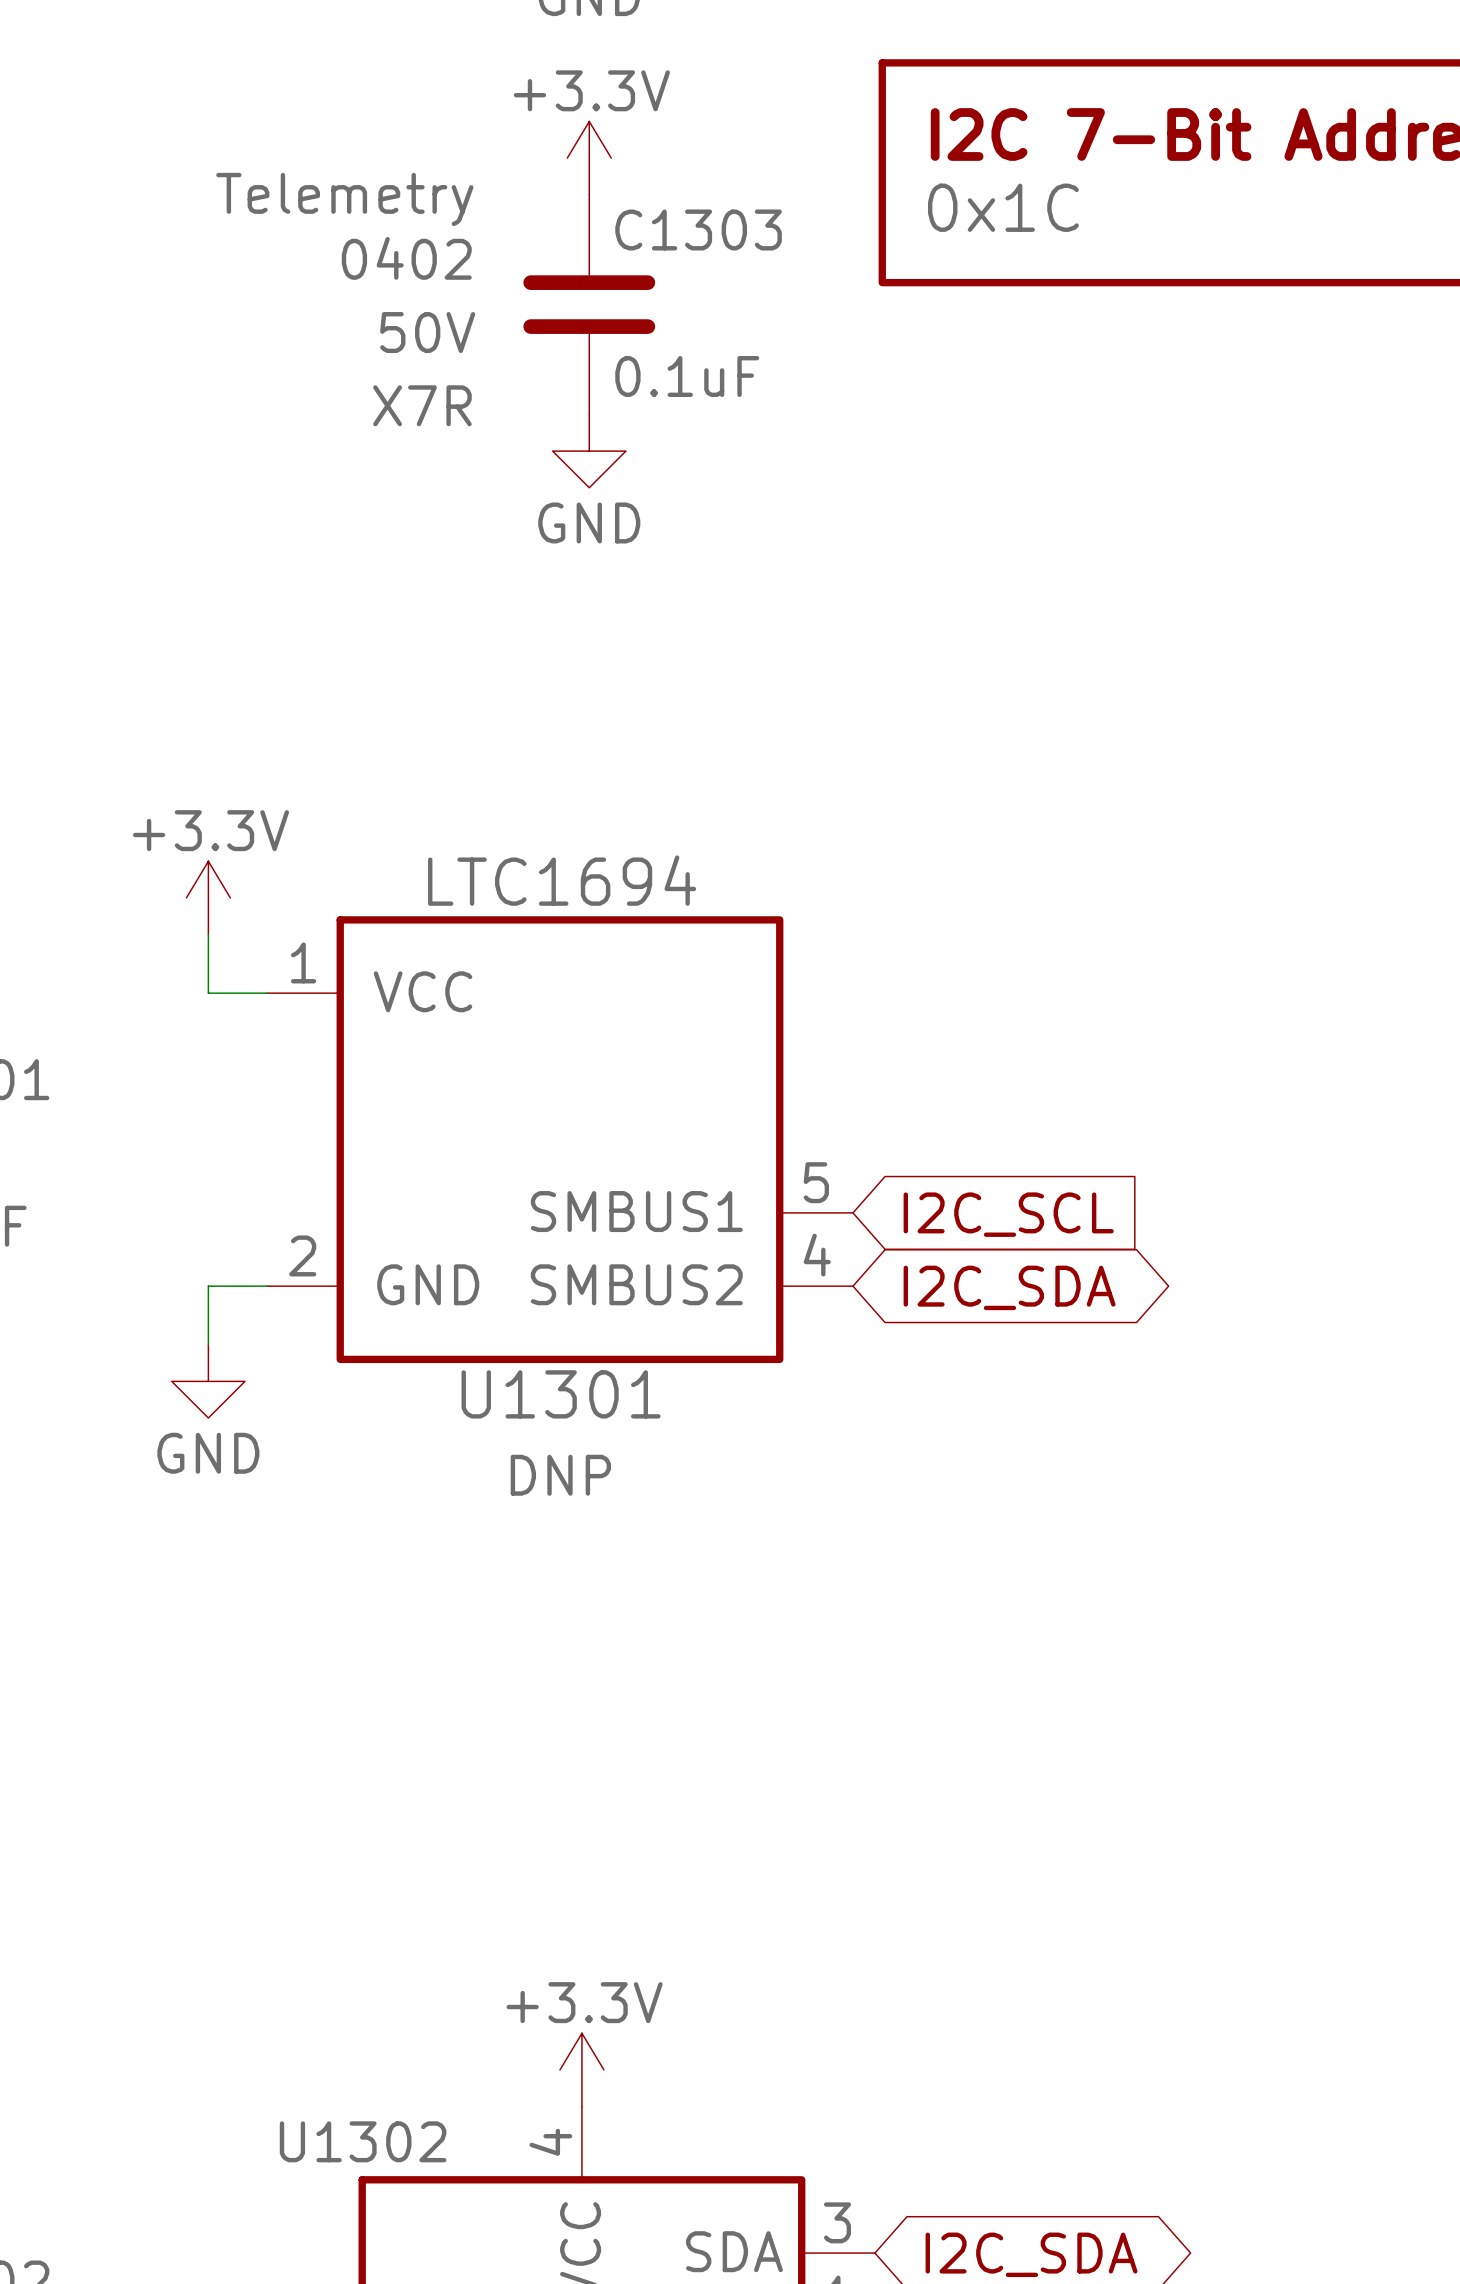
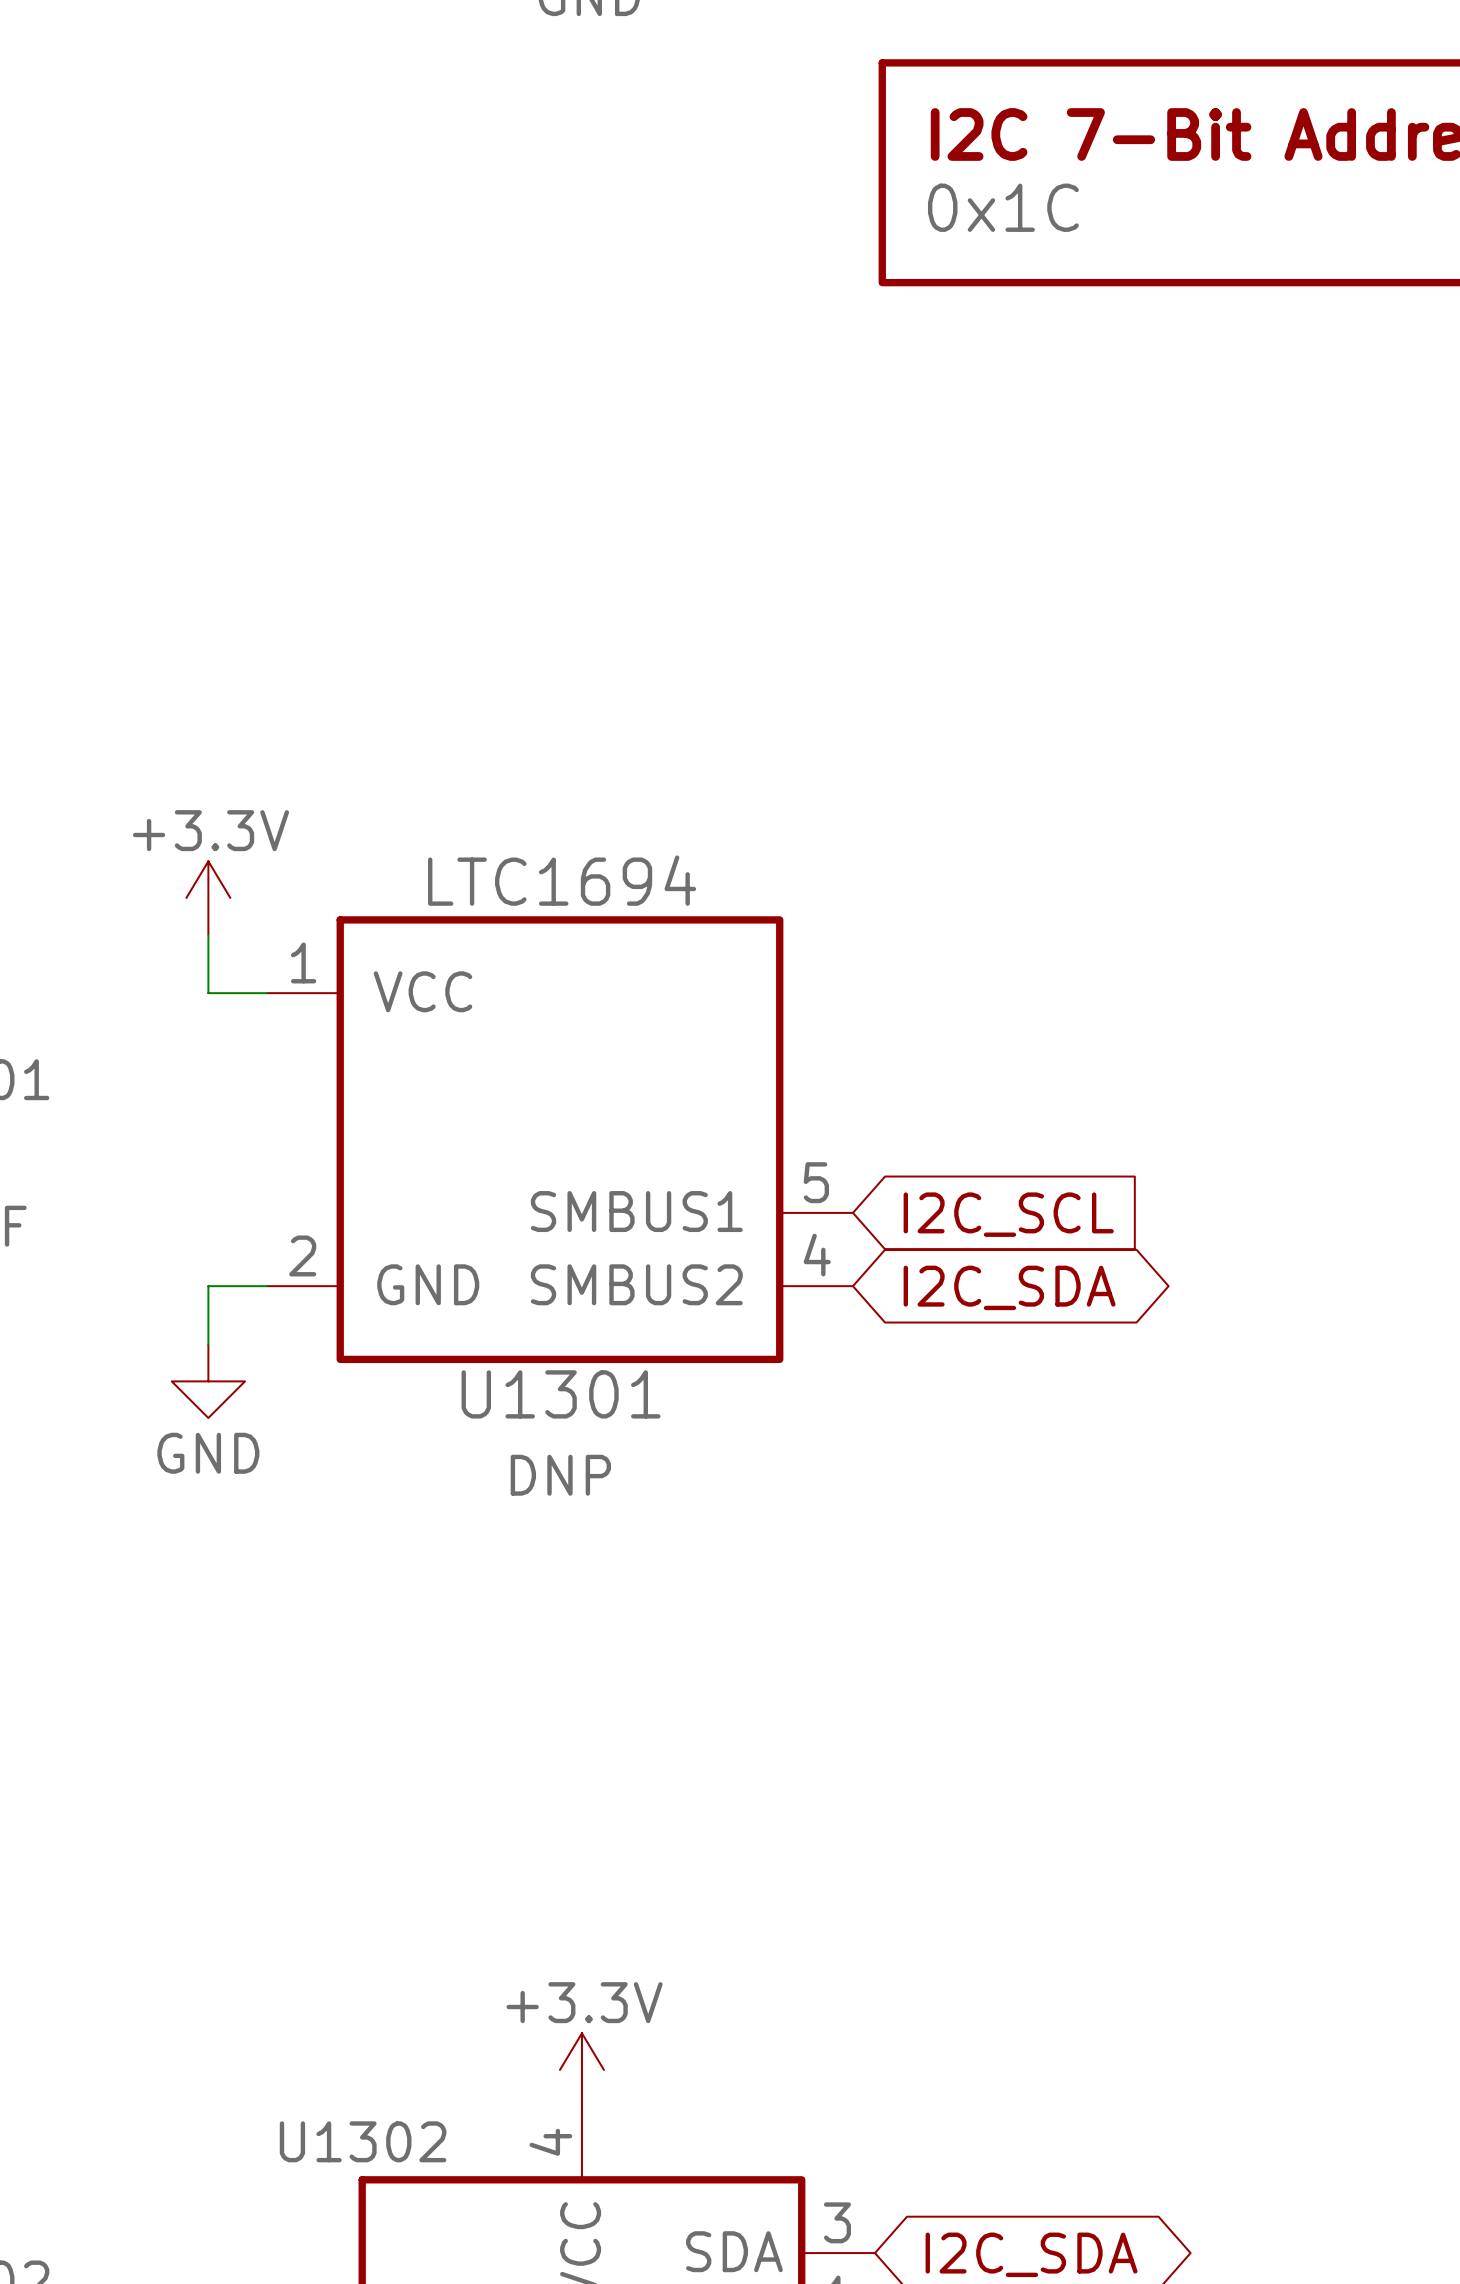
power symbol: +3.3V (589, 158) -> none
C1303: 0.1uF (589, 304) -> none
power symbol: GND (589, 451) -> none

